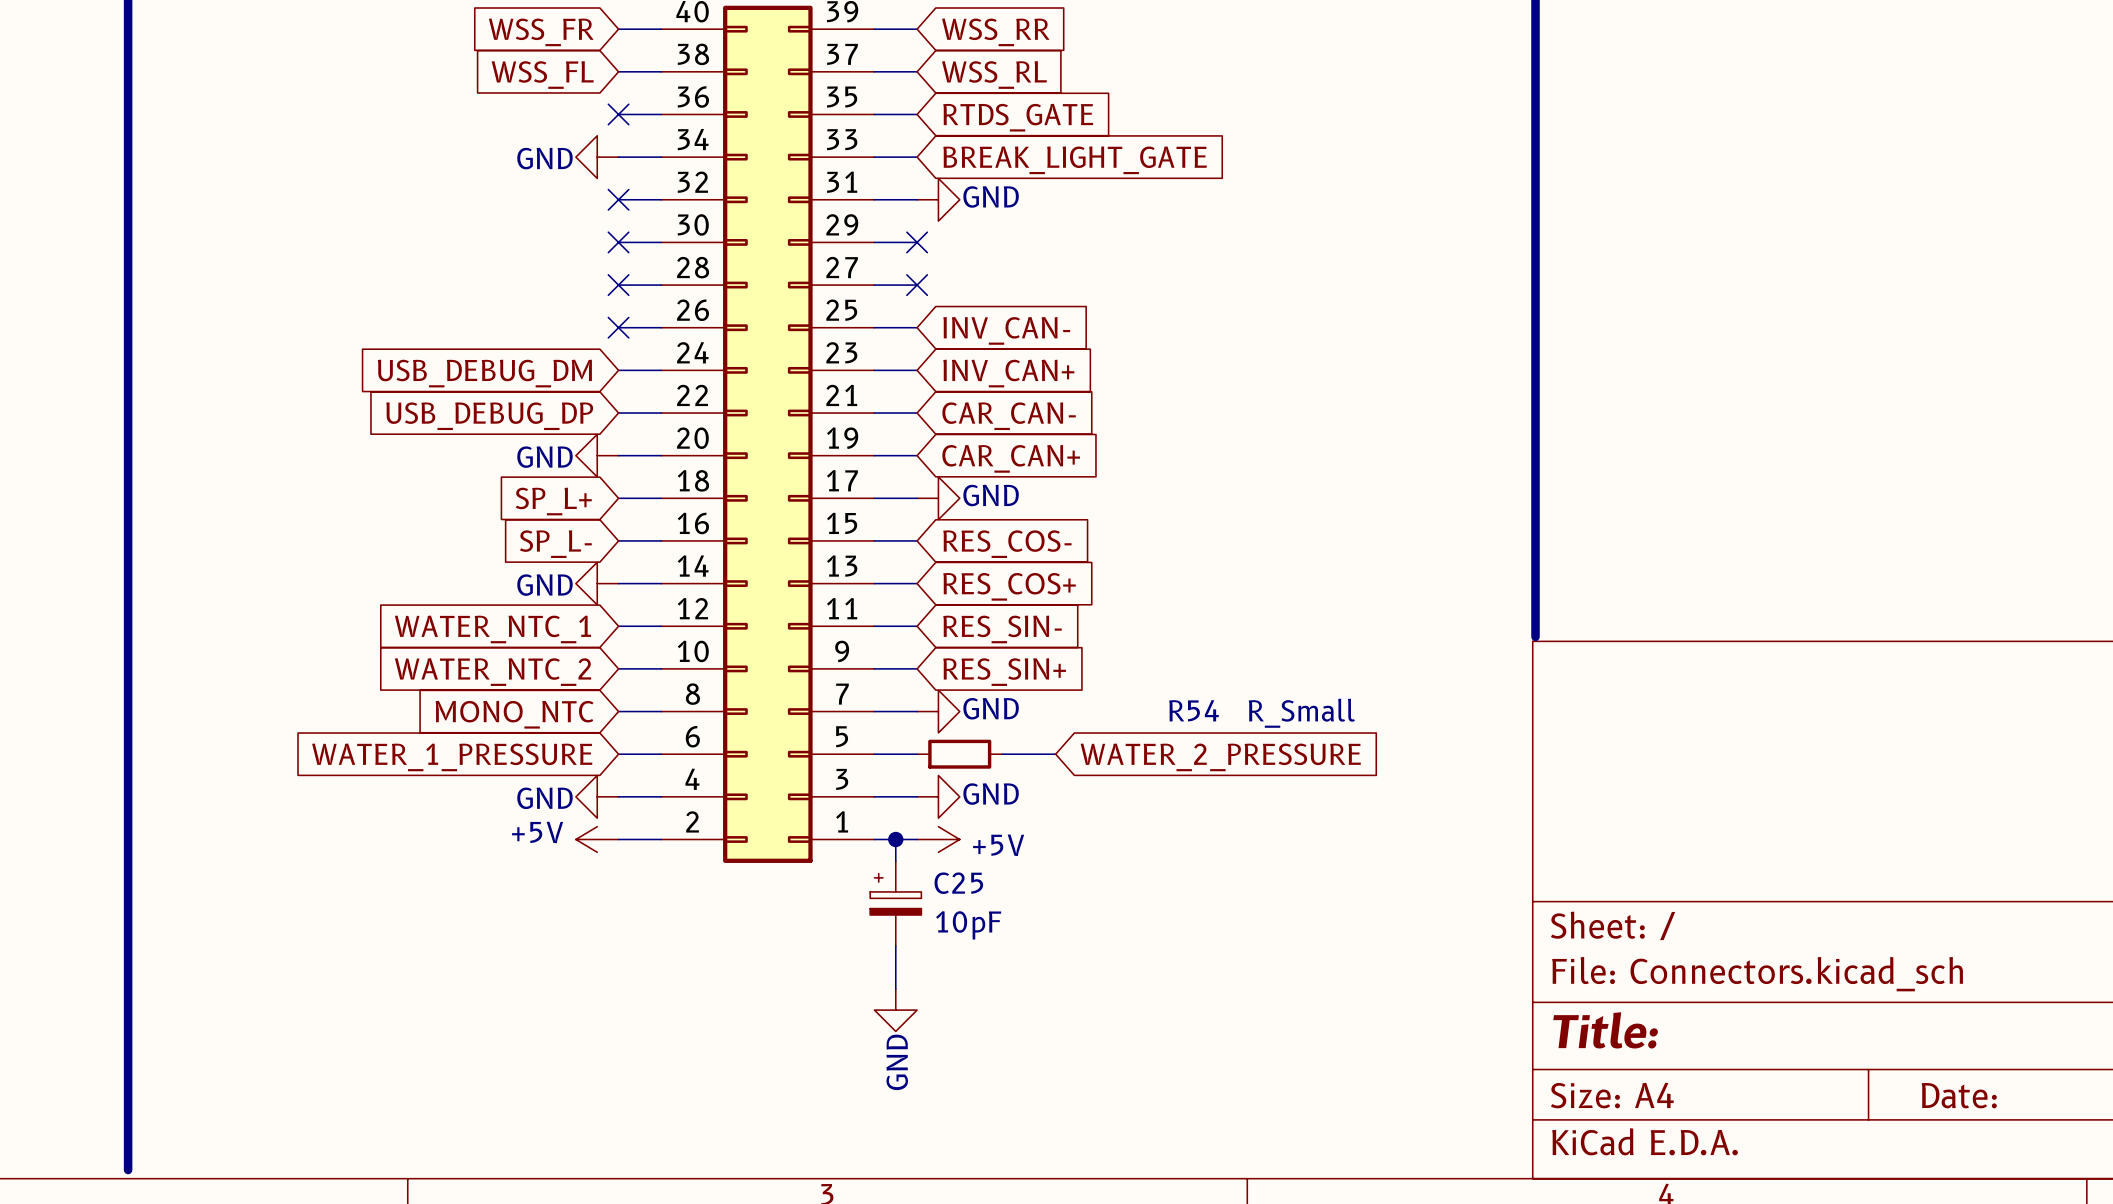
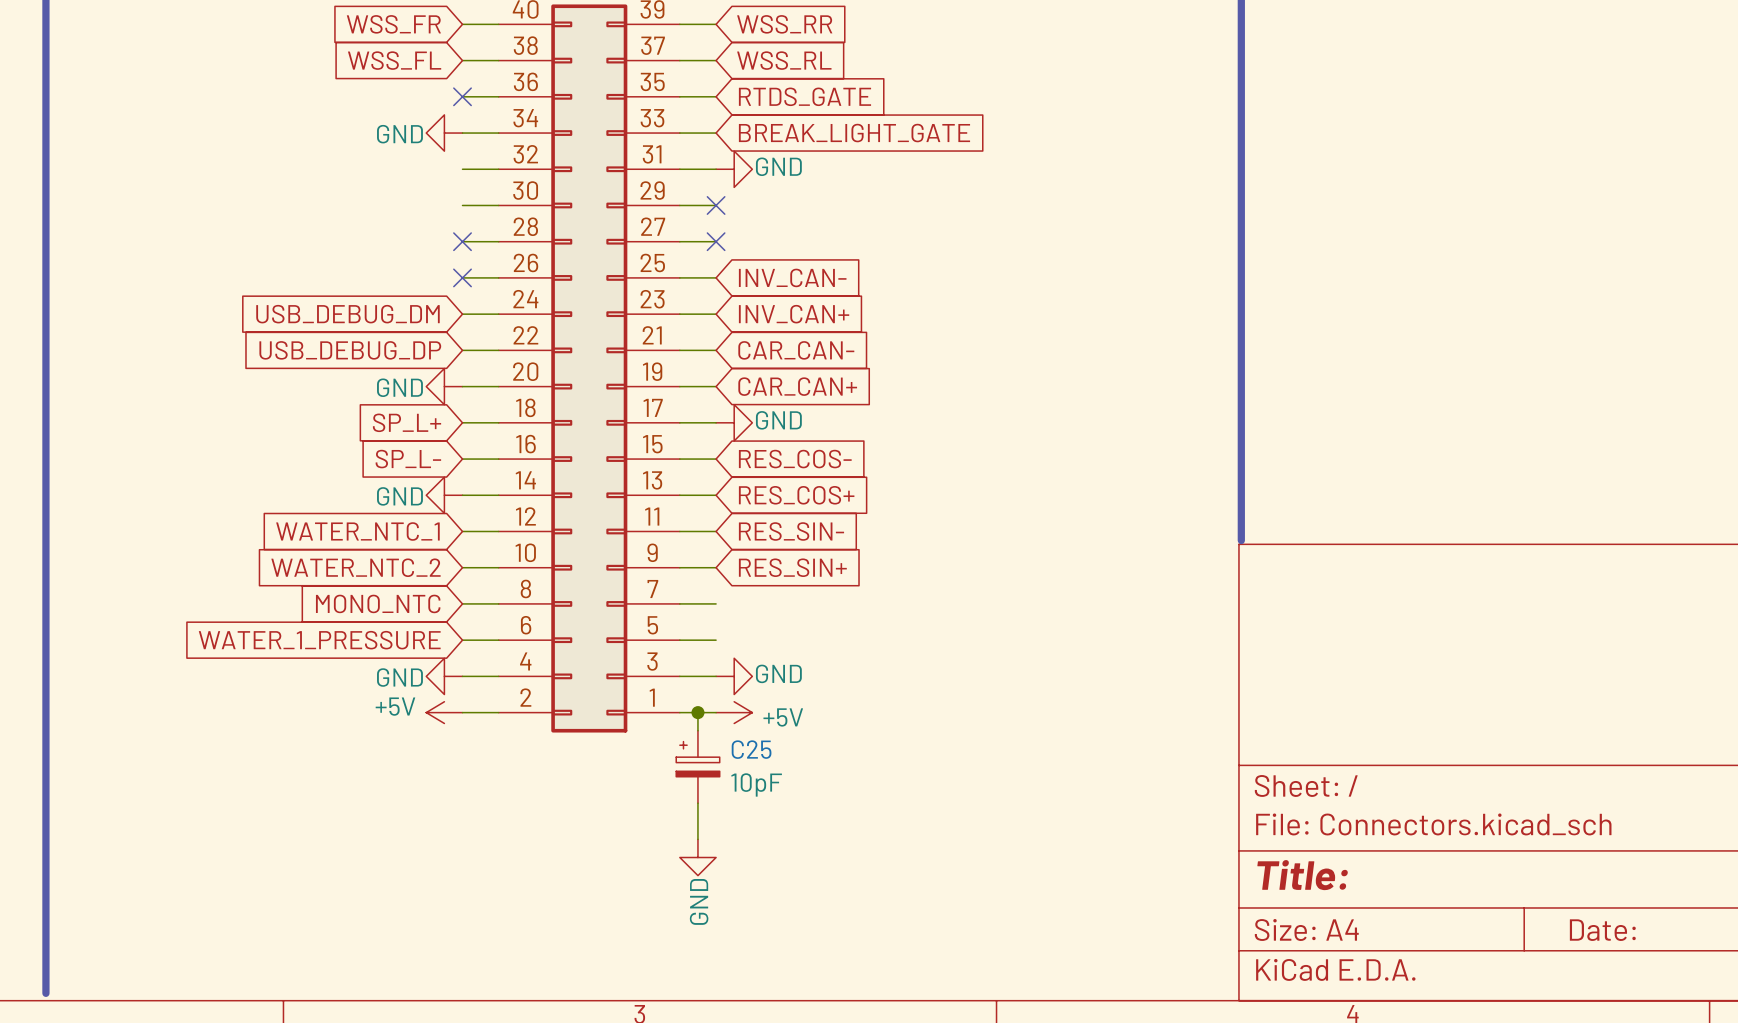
no-connect mark: (618, 199) -> none
no-connect mark: (618, 242) -> none
power symbol: GND (938, 711) -> none
R54: R_Small (959, 754) -> none
wire: (1002, 754) (1055, 754) -> none
global label: WATER_2_PRESSURE (1220, 757) -> none

